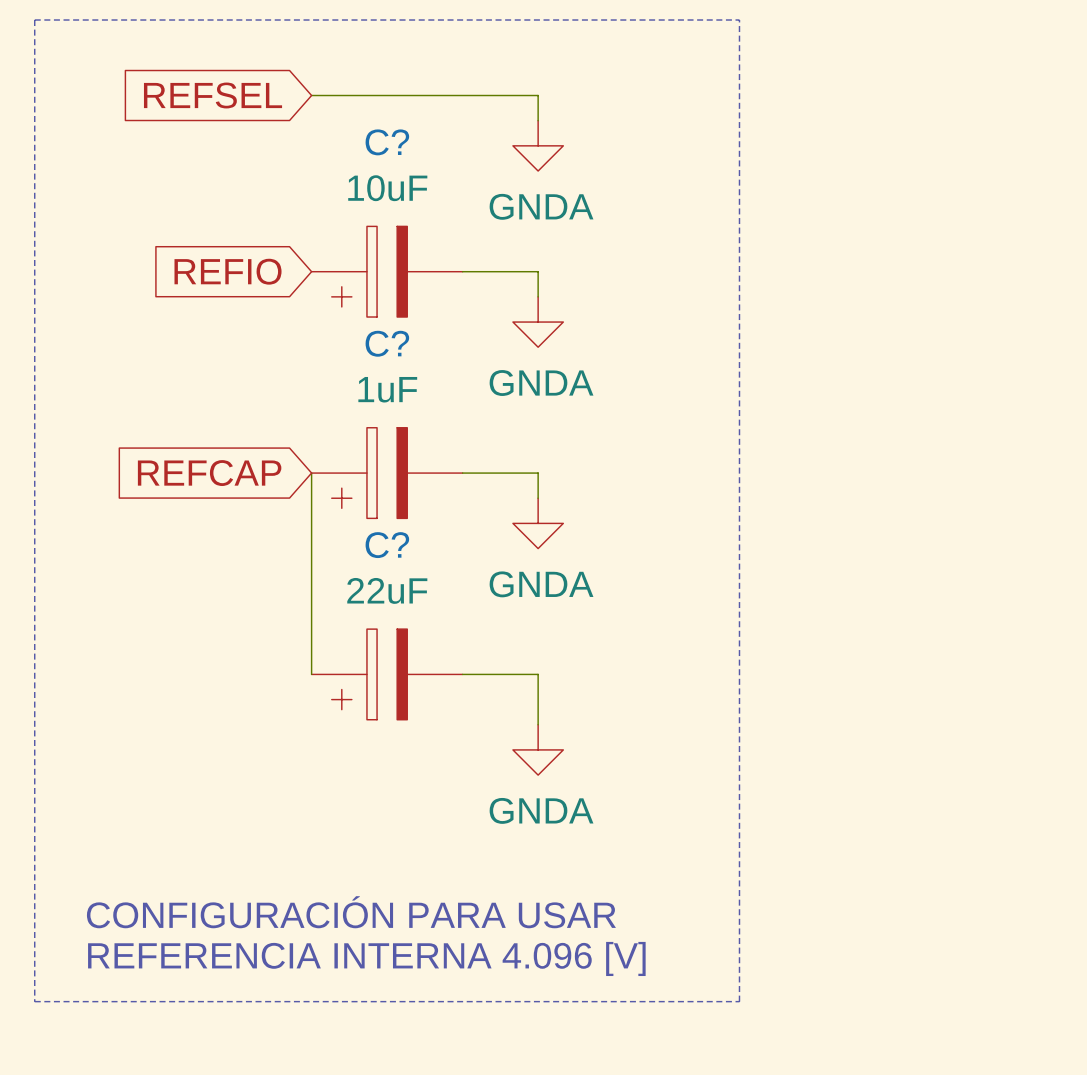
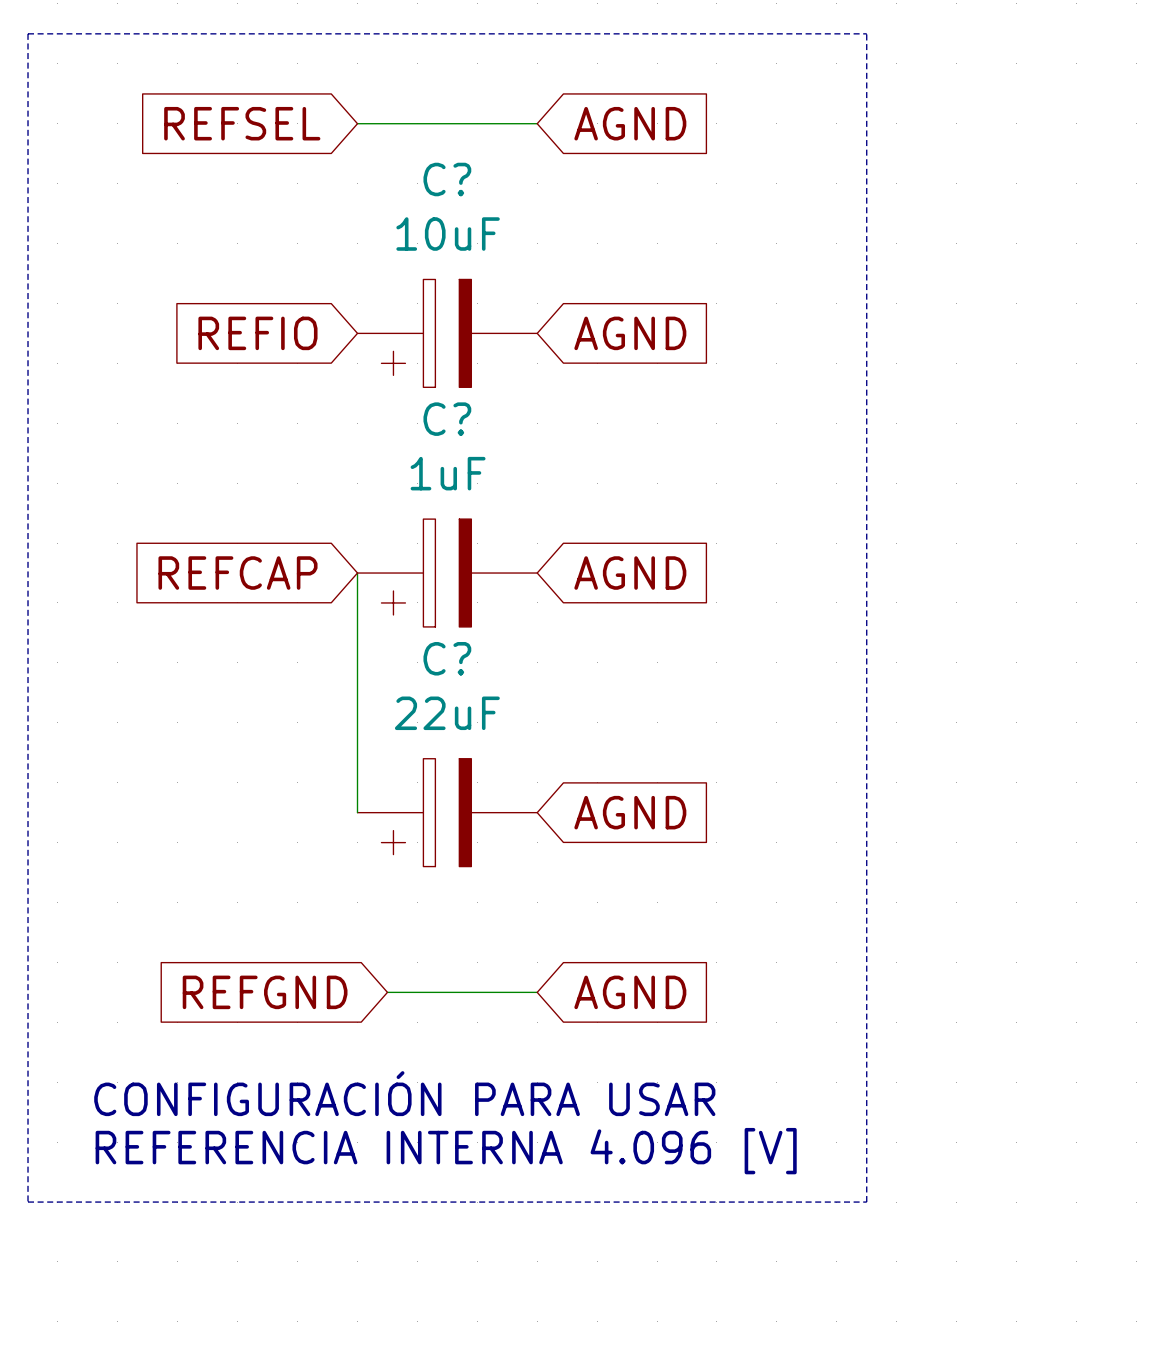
wire: (462, 95) (538, 95) (538, 120) -> none
global label: none -> AGND (630, 123)
power symbol: GNDA (538, 145) -> none
wire: (462, 271) (538, 271) (538, 296) -> none
global label: none -> AGND (630, 333)
power symbol: GNDA (538, 322) -> none
wire: (462, 473) (538, 473) (538, 498) -> none
global label: none -> AGND (630, 573)
power symbol: GNDA (538, 523) -> none
wire: (462, 674) (538, 674) (538, 724) -> none
global label: none -> AGND (630, 812)
power symbol: GNDA (538, 749) -> none
global label: none -> REFGND (265, 992)
wire: none -> (387, 992) (537, 992)
global label: none -> AGND (630, 992)

